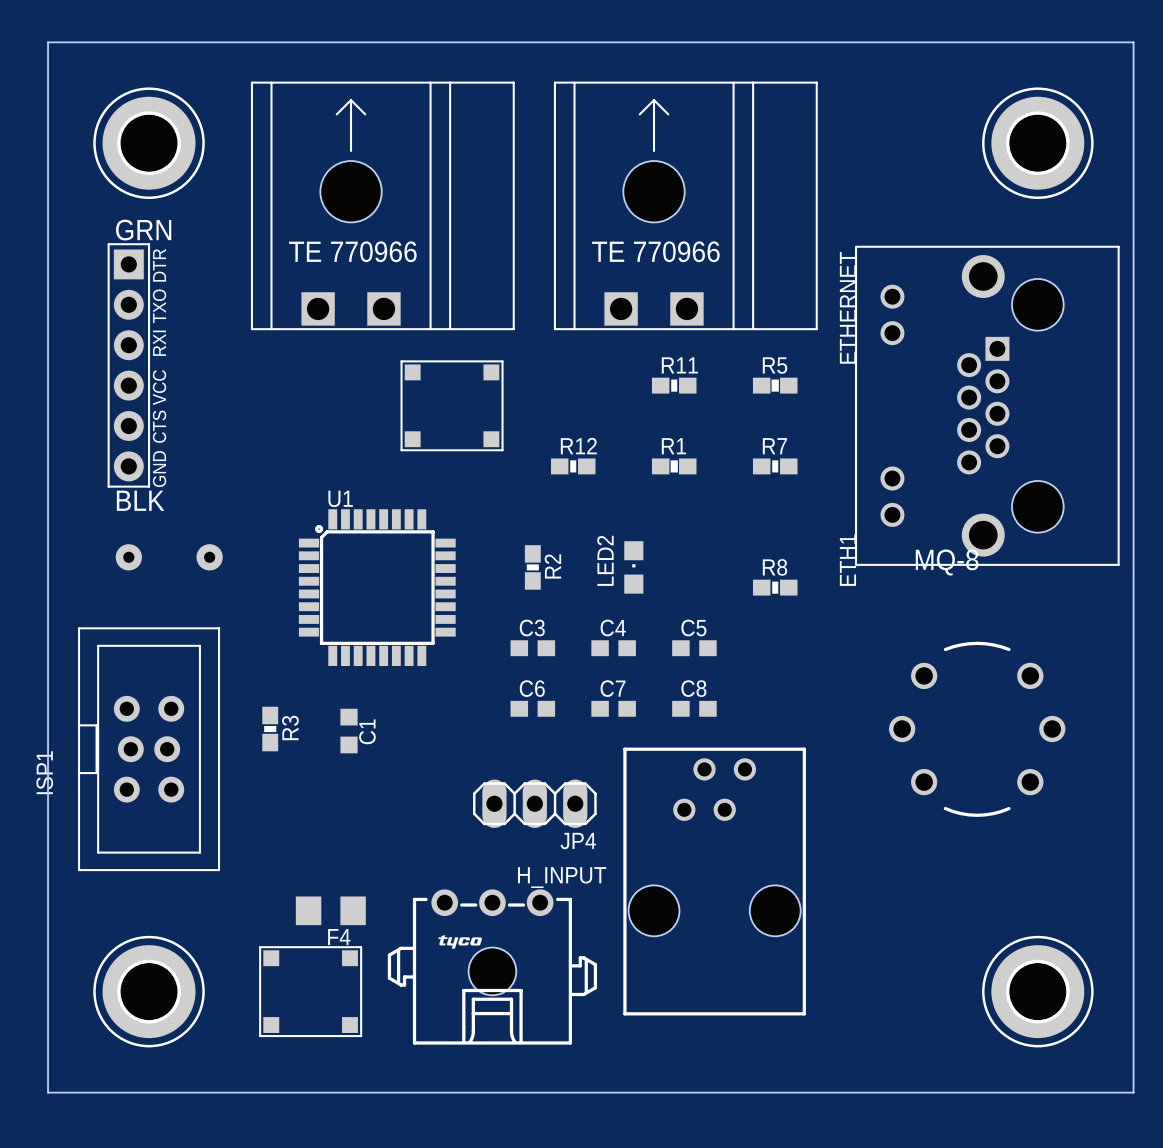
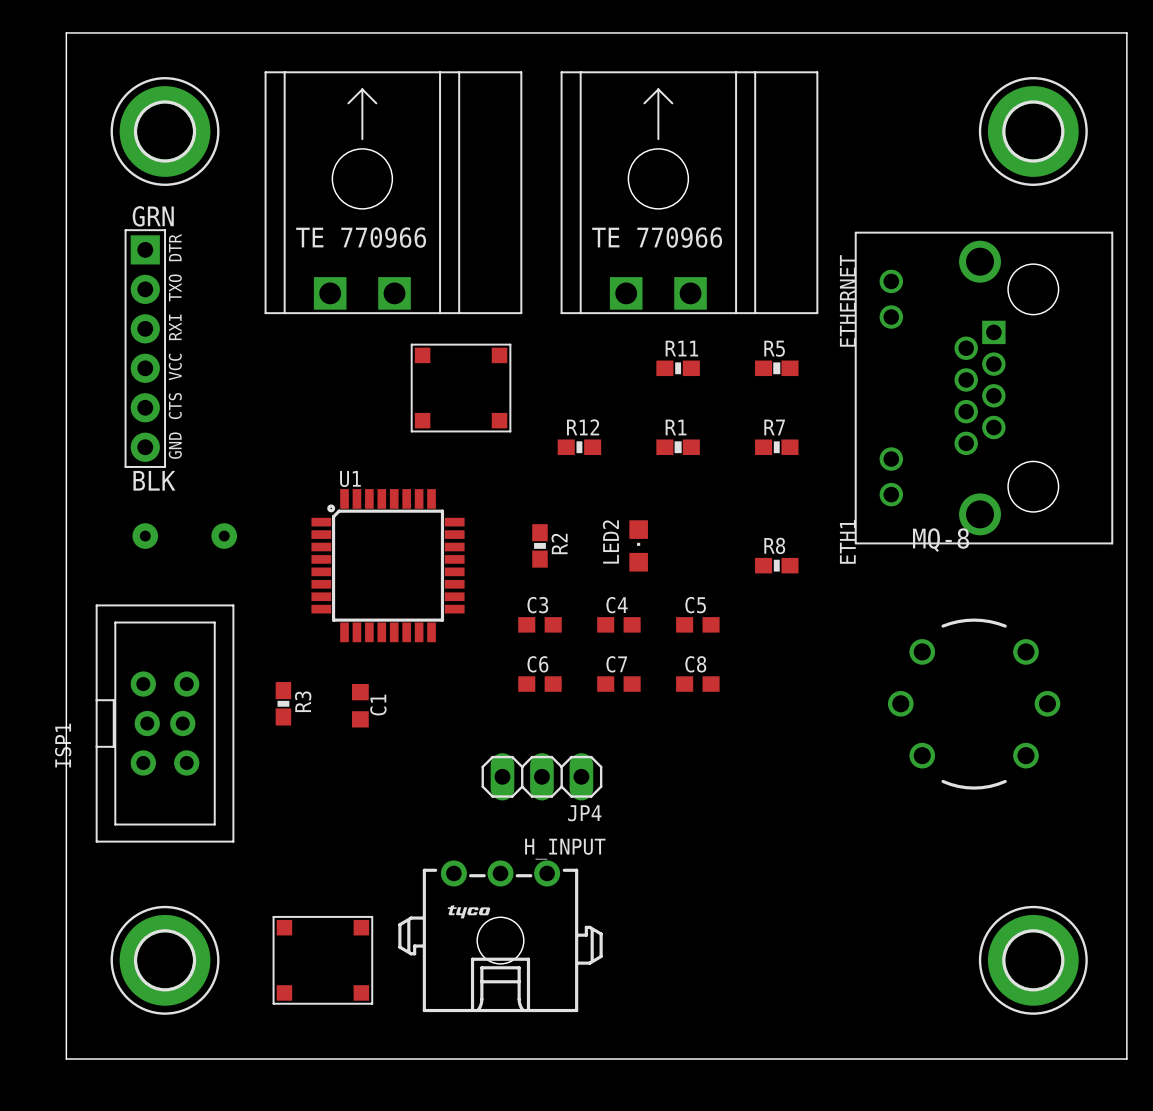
part: (714, 881) -> none
F4: (330, 910) -> none

